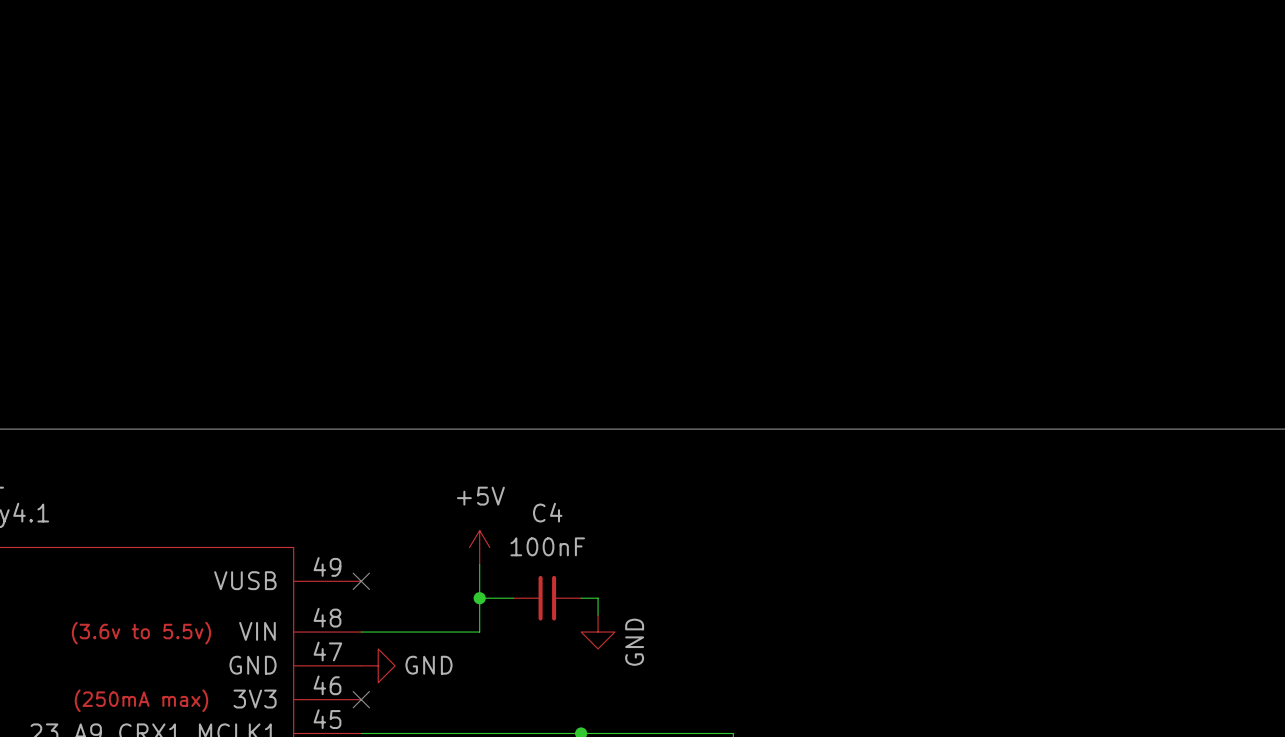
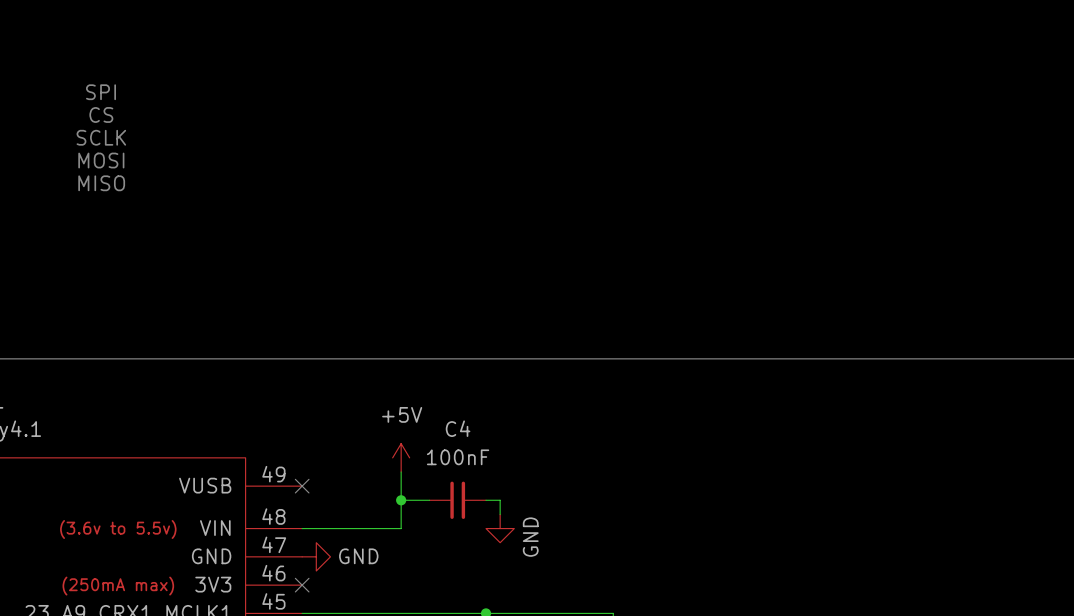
text: none -> SPI (101, 92)
text: none -> CS (101, 114)
text: none -> SCLK (101, 137)
text: none -> MOSI (101, 160)
text: none -> MISO (101, 183)

